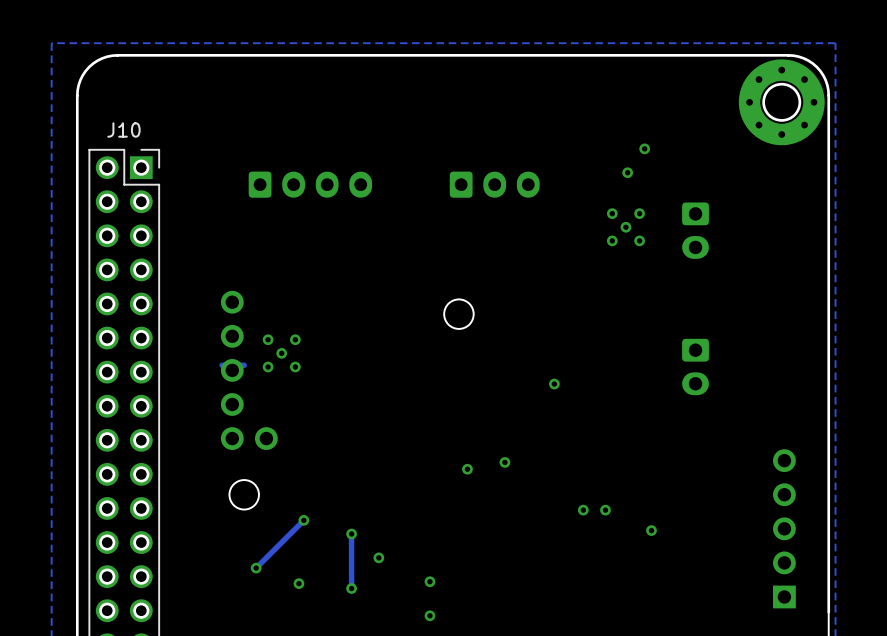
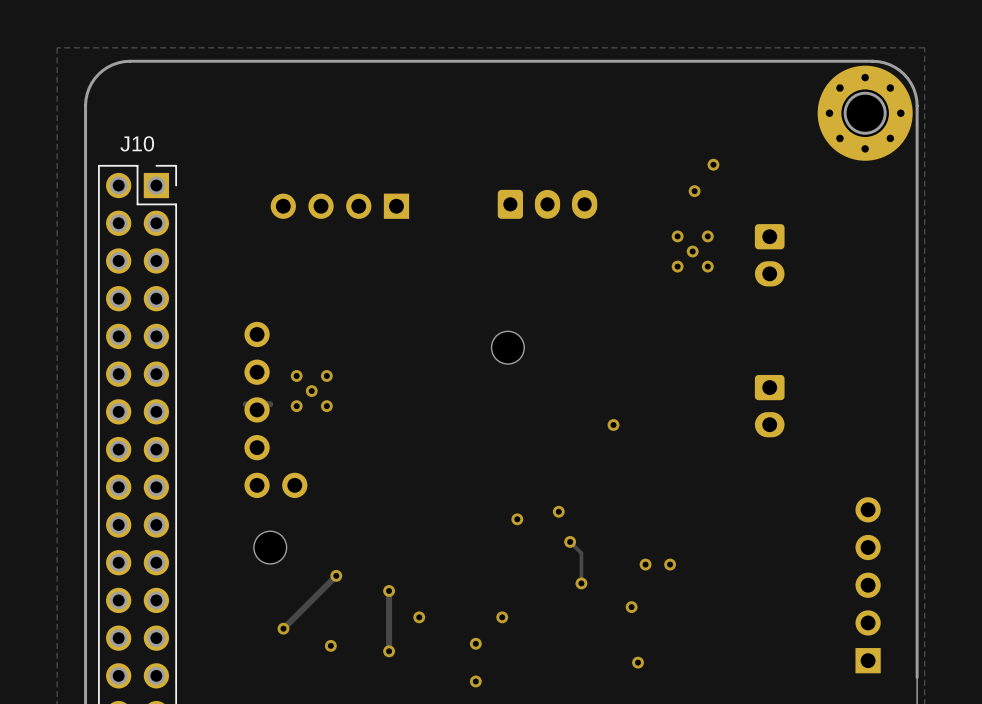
part footprint: [248, 171, 373, 198] -> [270, 193, 410, 219]
track: none -> (570, 541) (581, 553) (581, 583)
via: none -> (570, 541)
via: none -> (581, 583)
via: (651, 530) -> none
via: none -> (631, 607)
via: none -> (502, 617)
via: none -> (638, 662)

